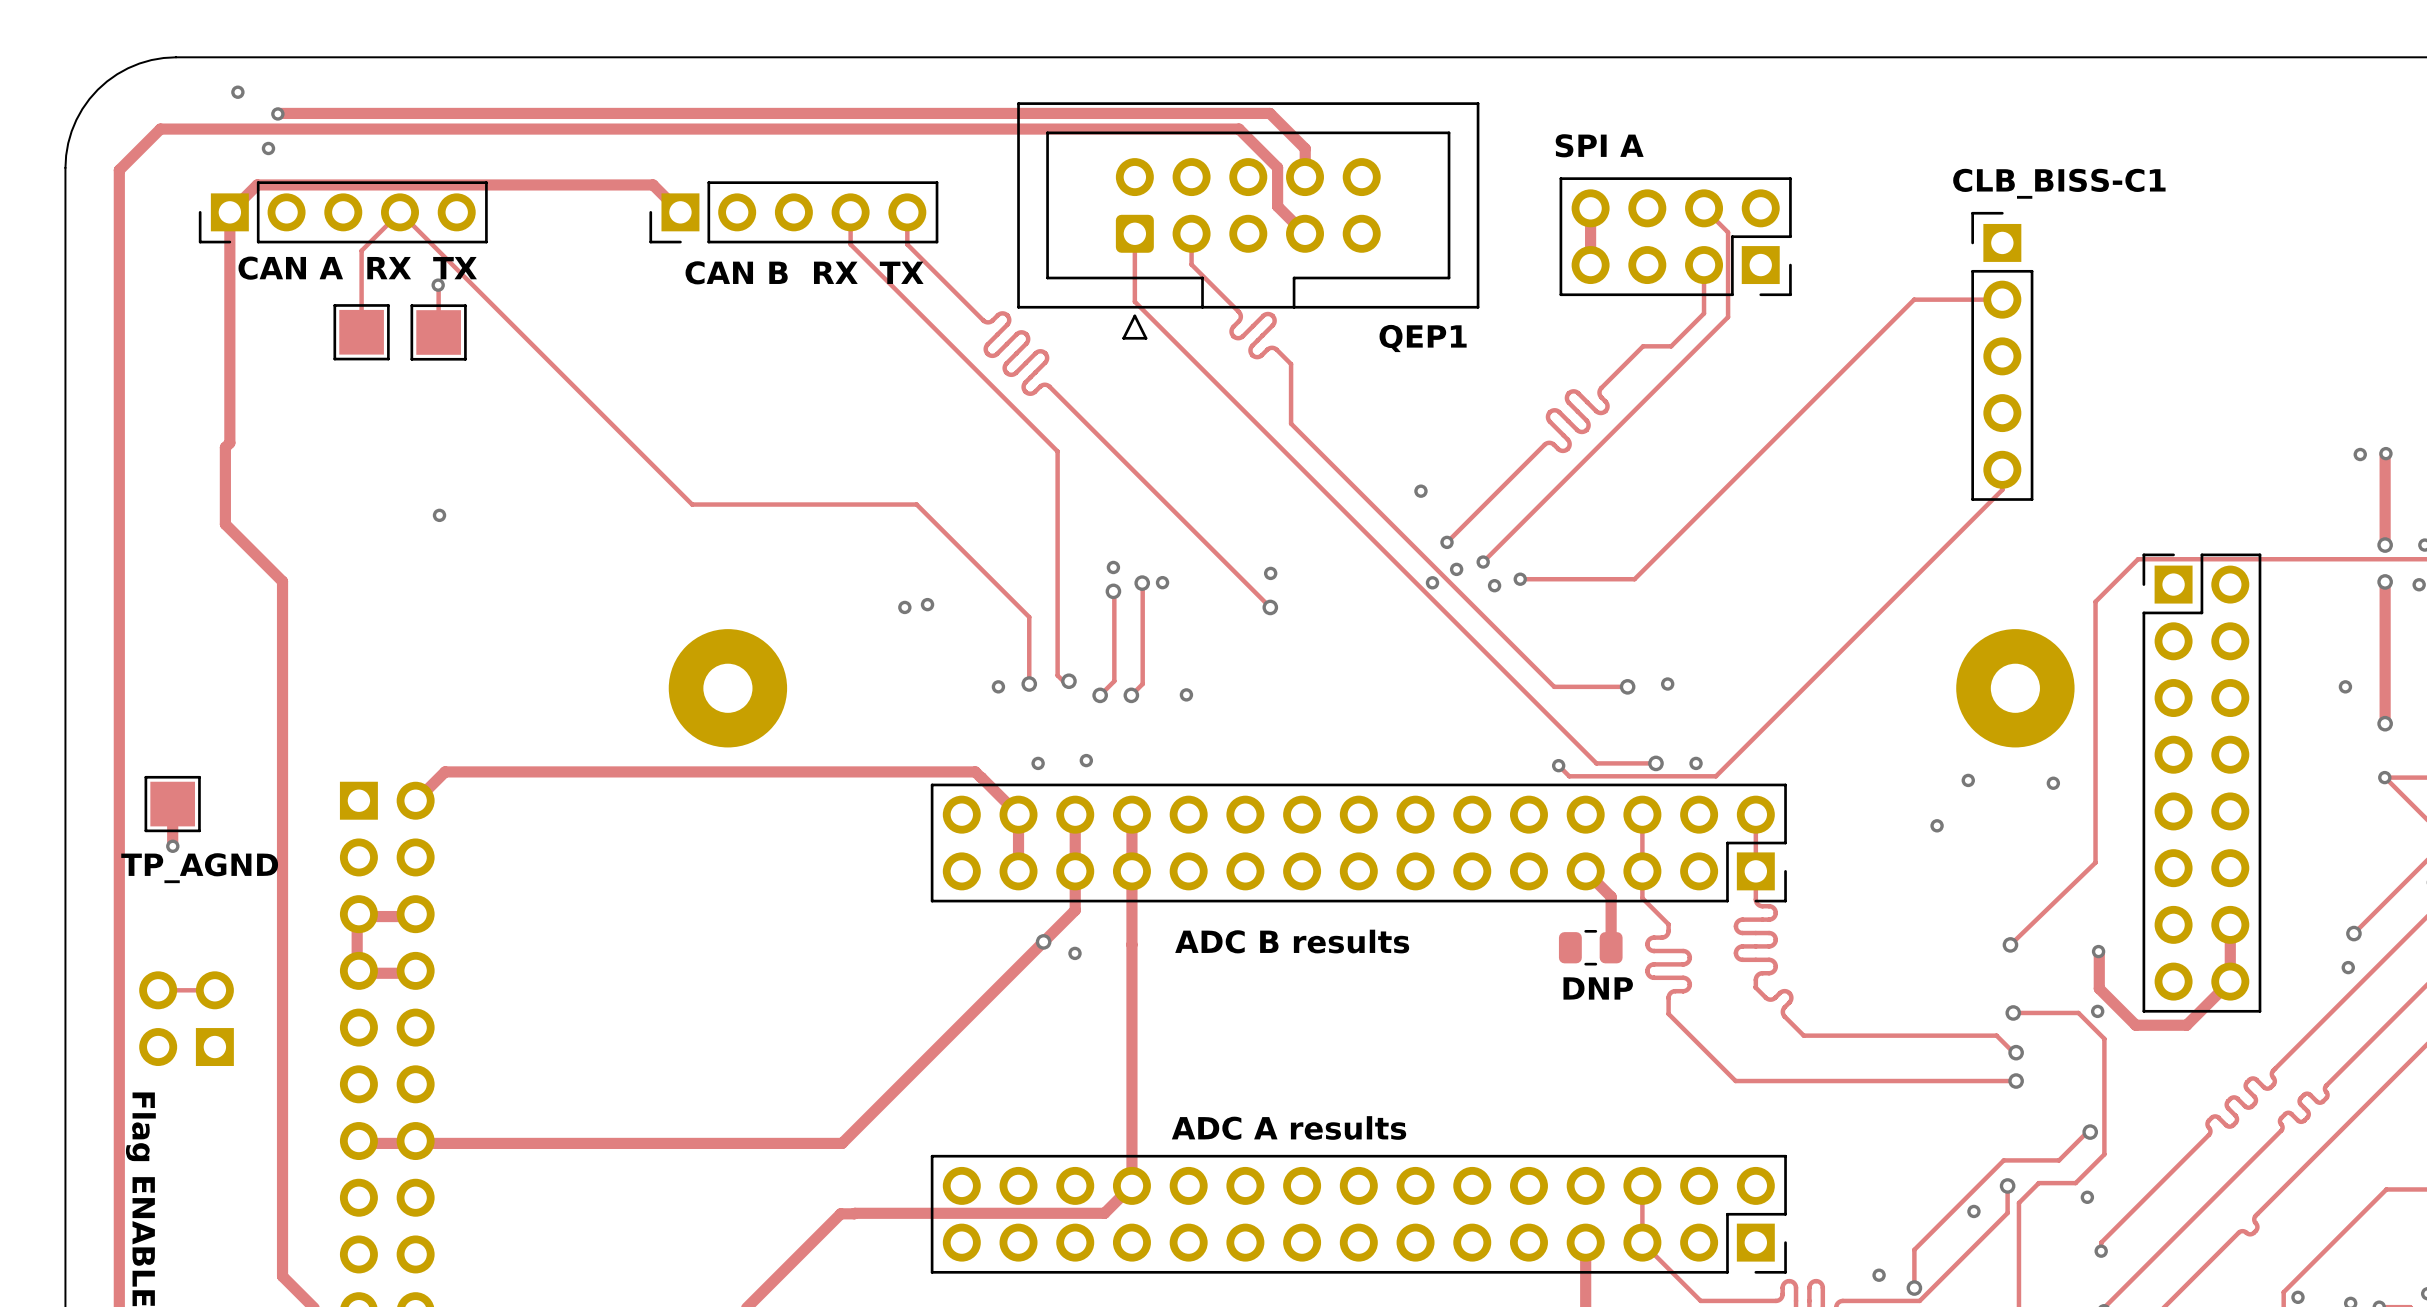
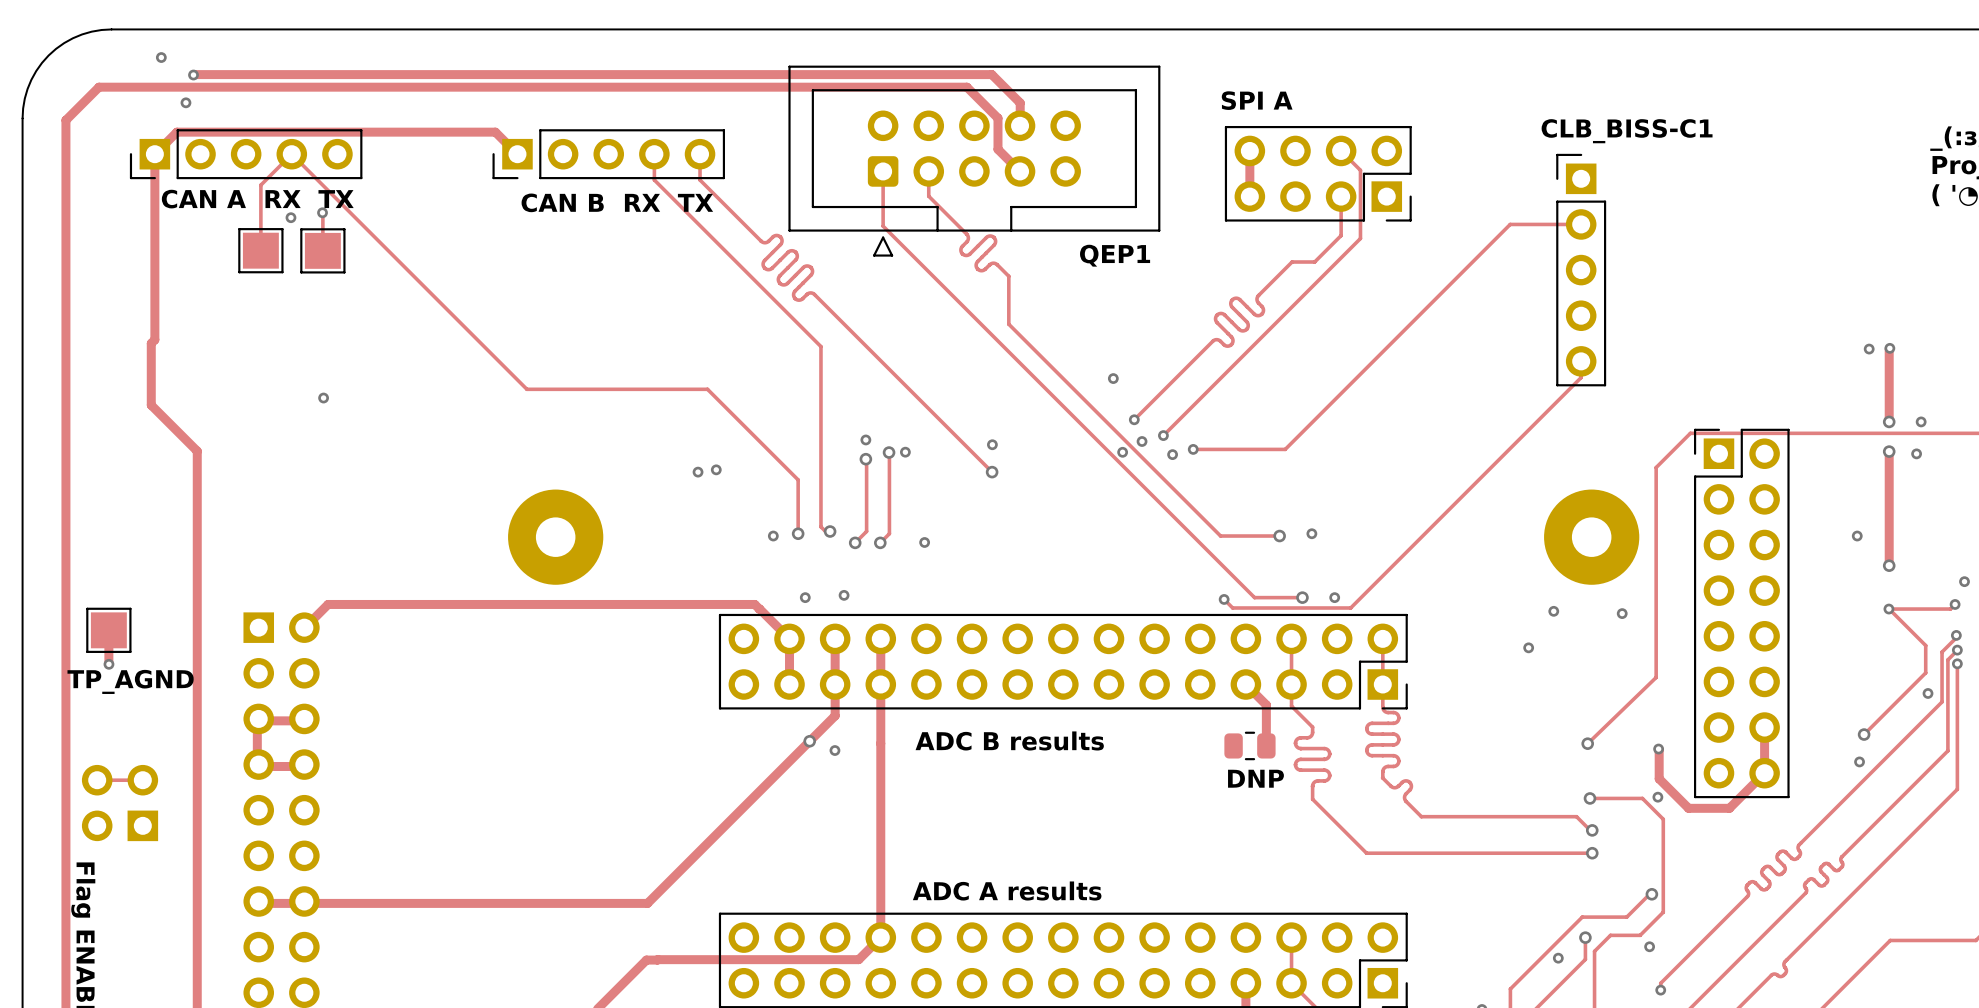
via: none -> (290, 217)

